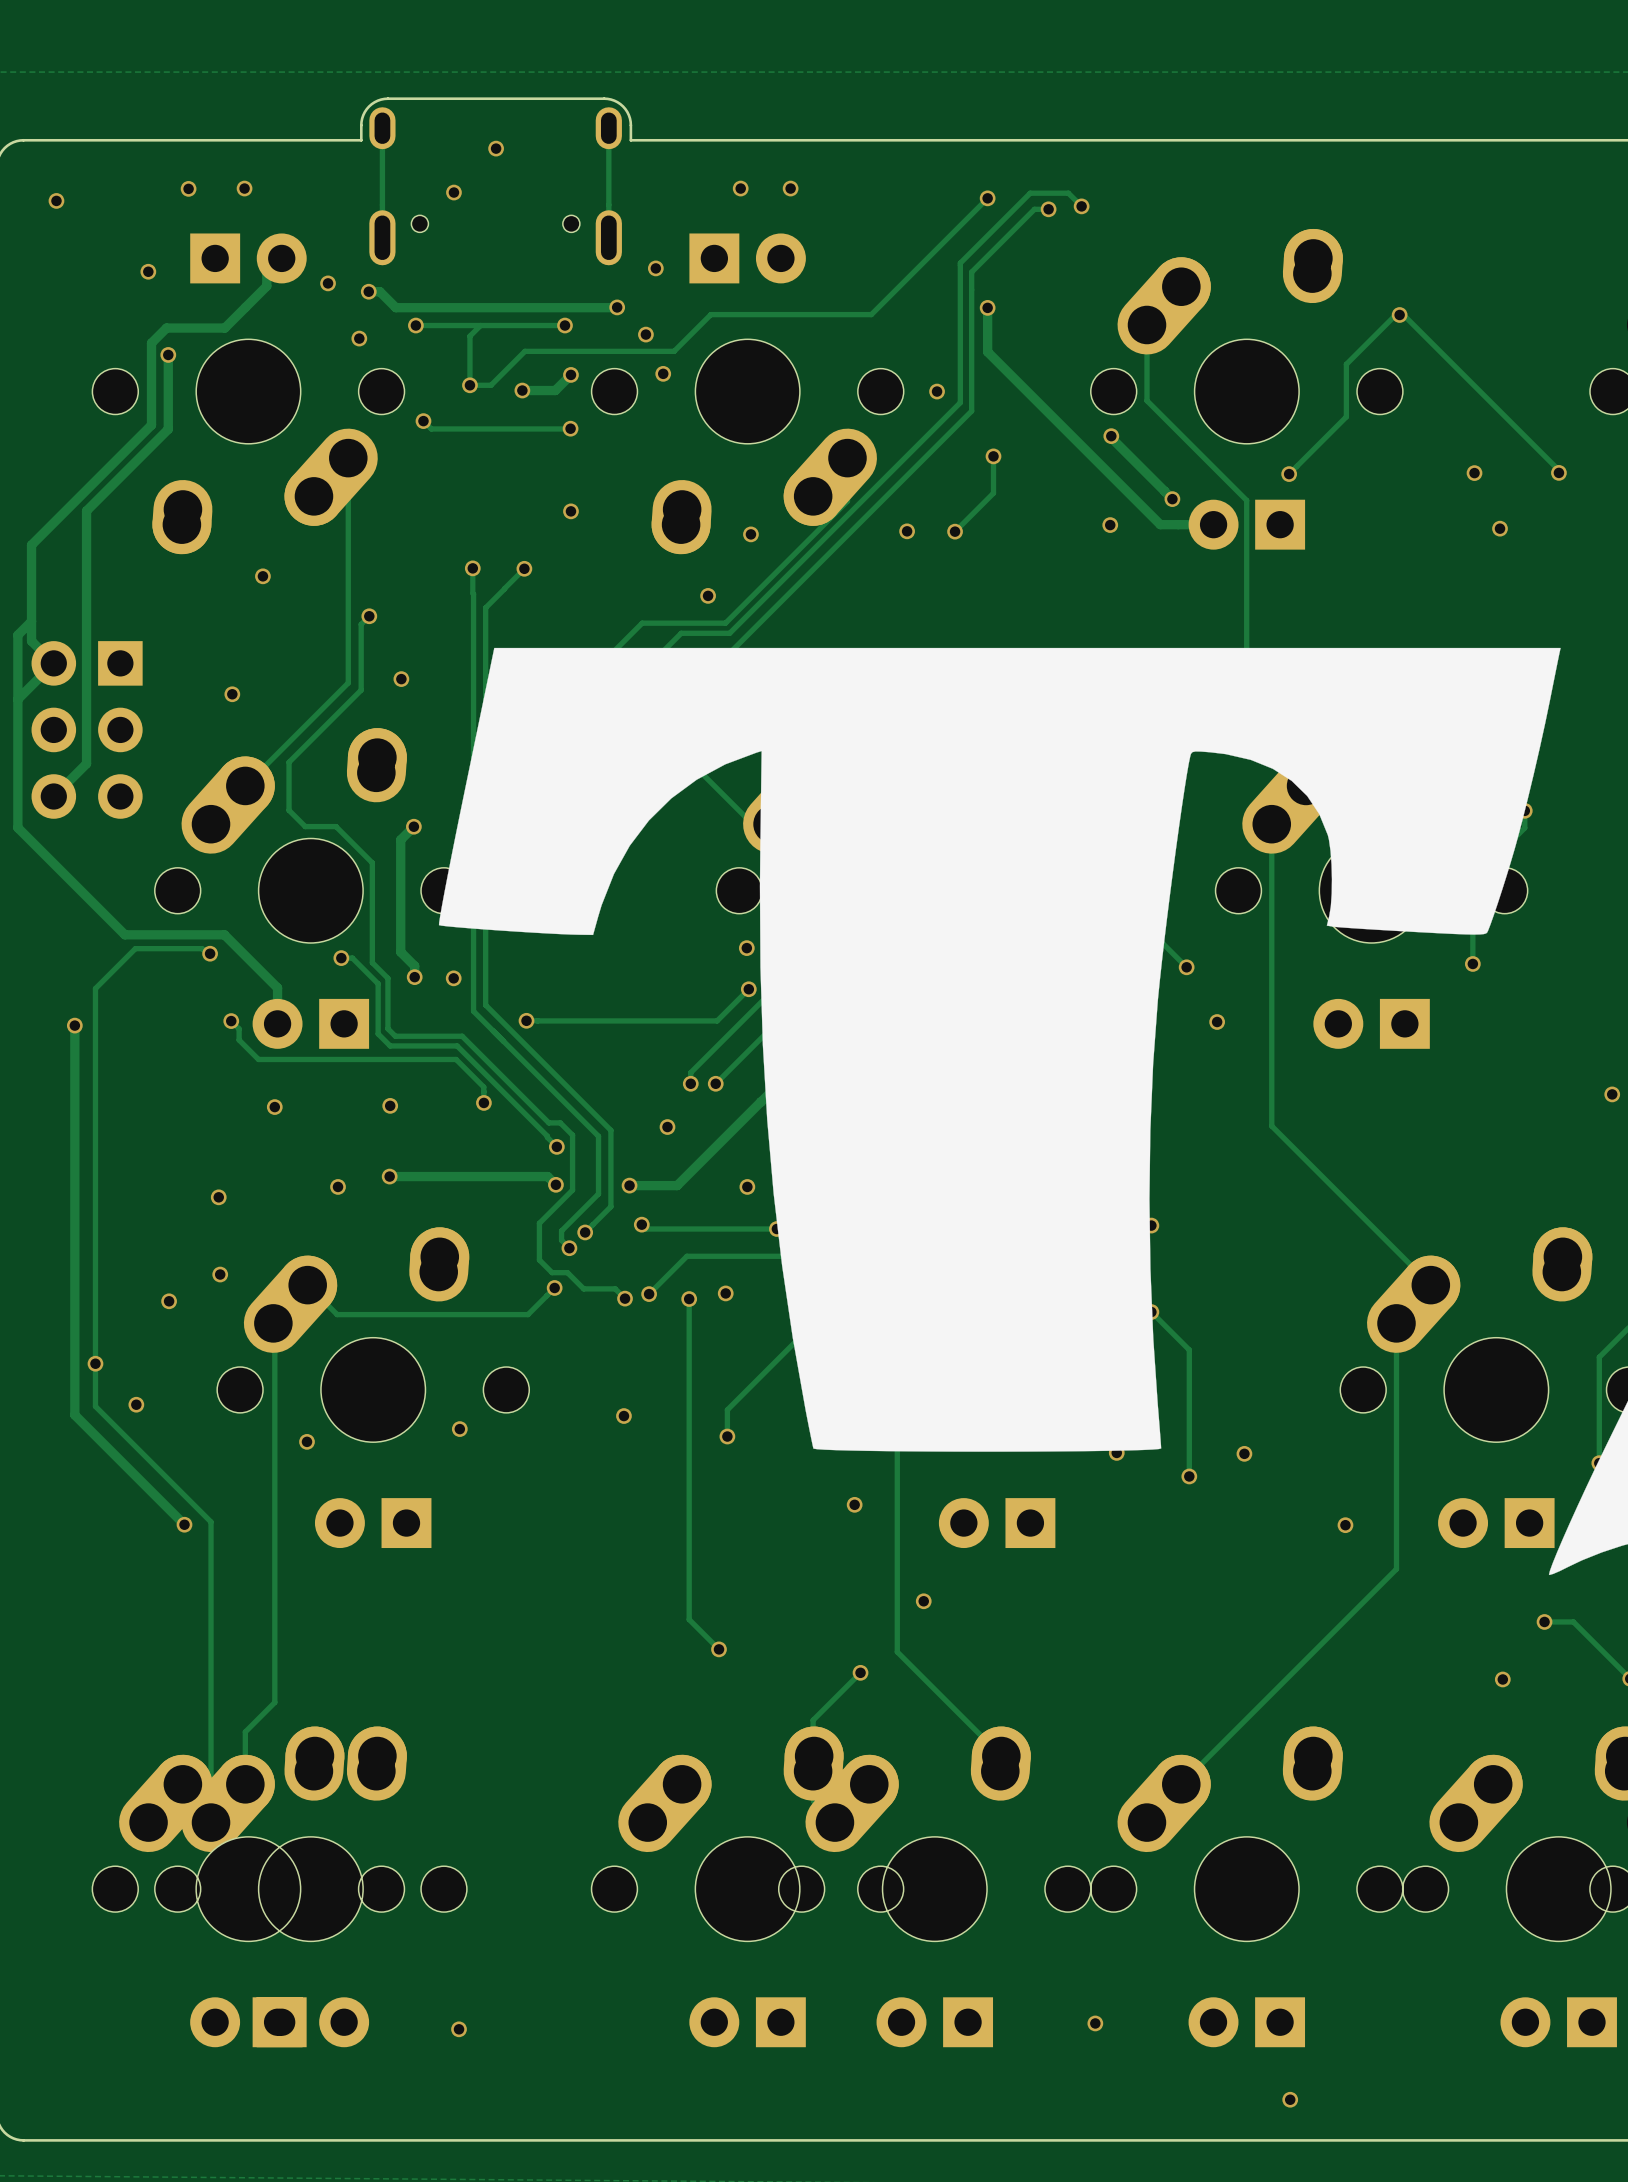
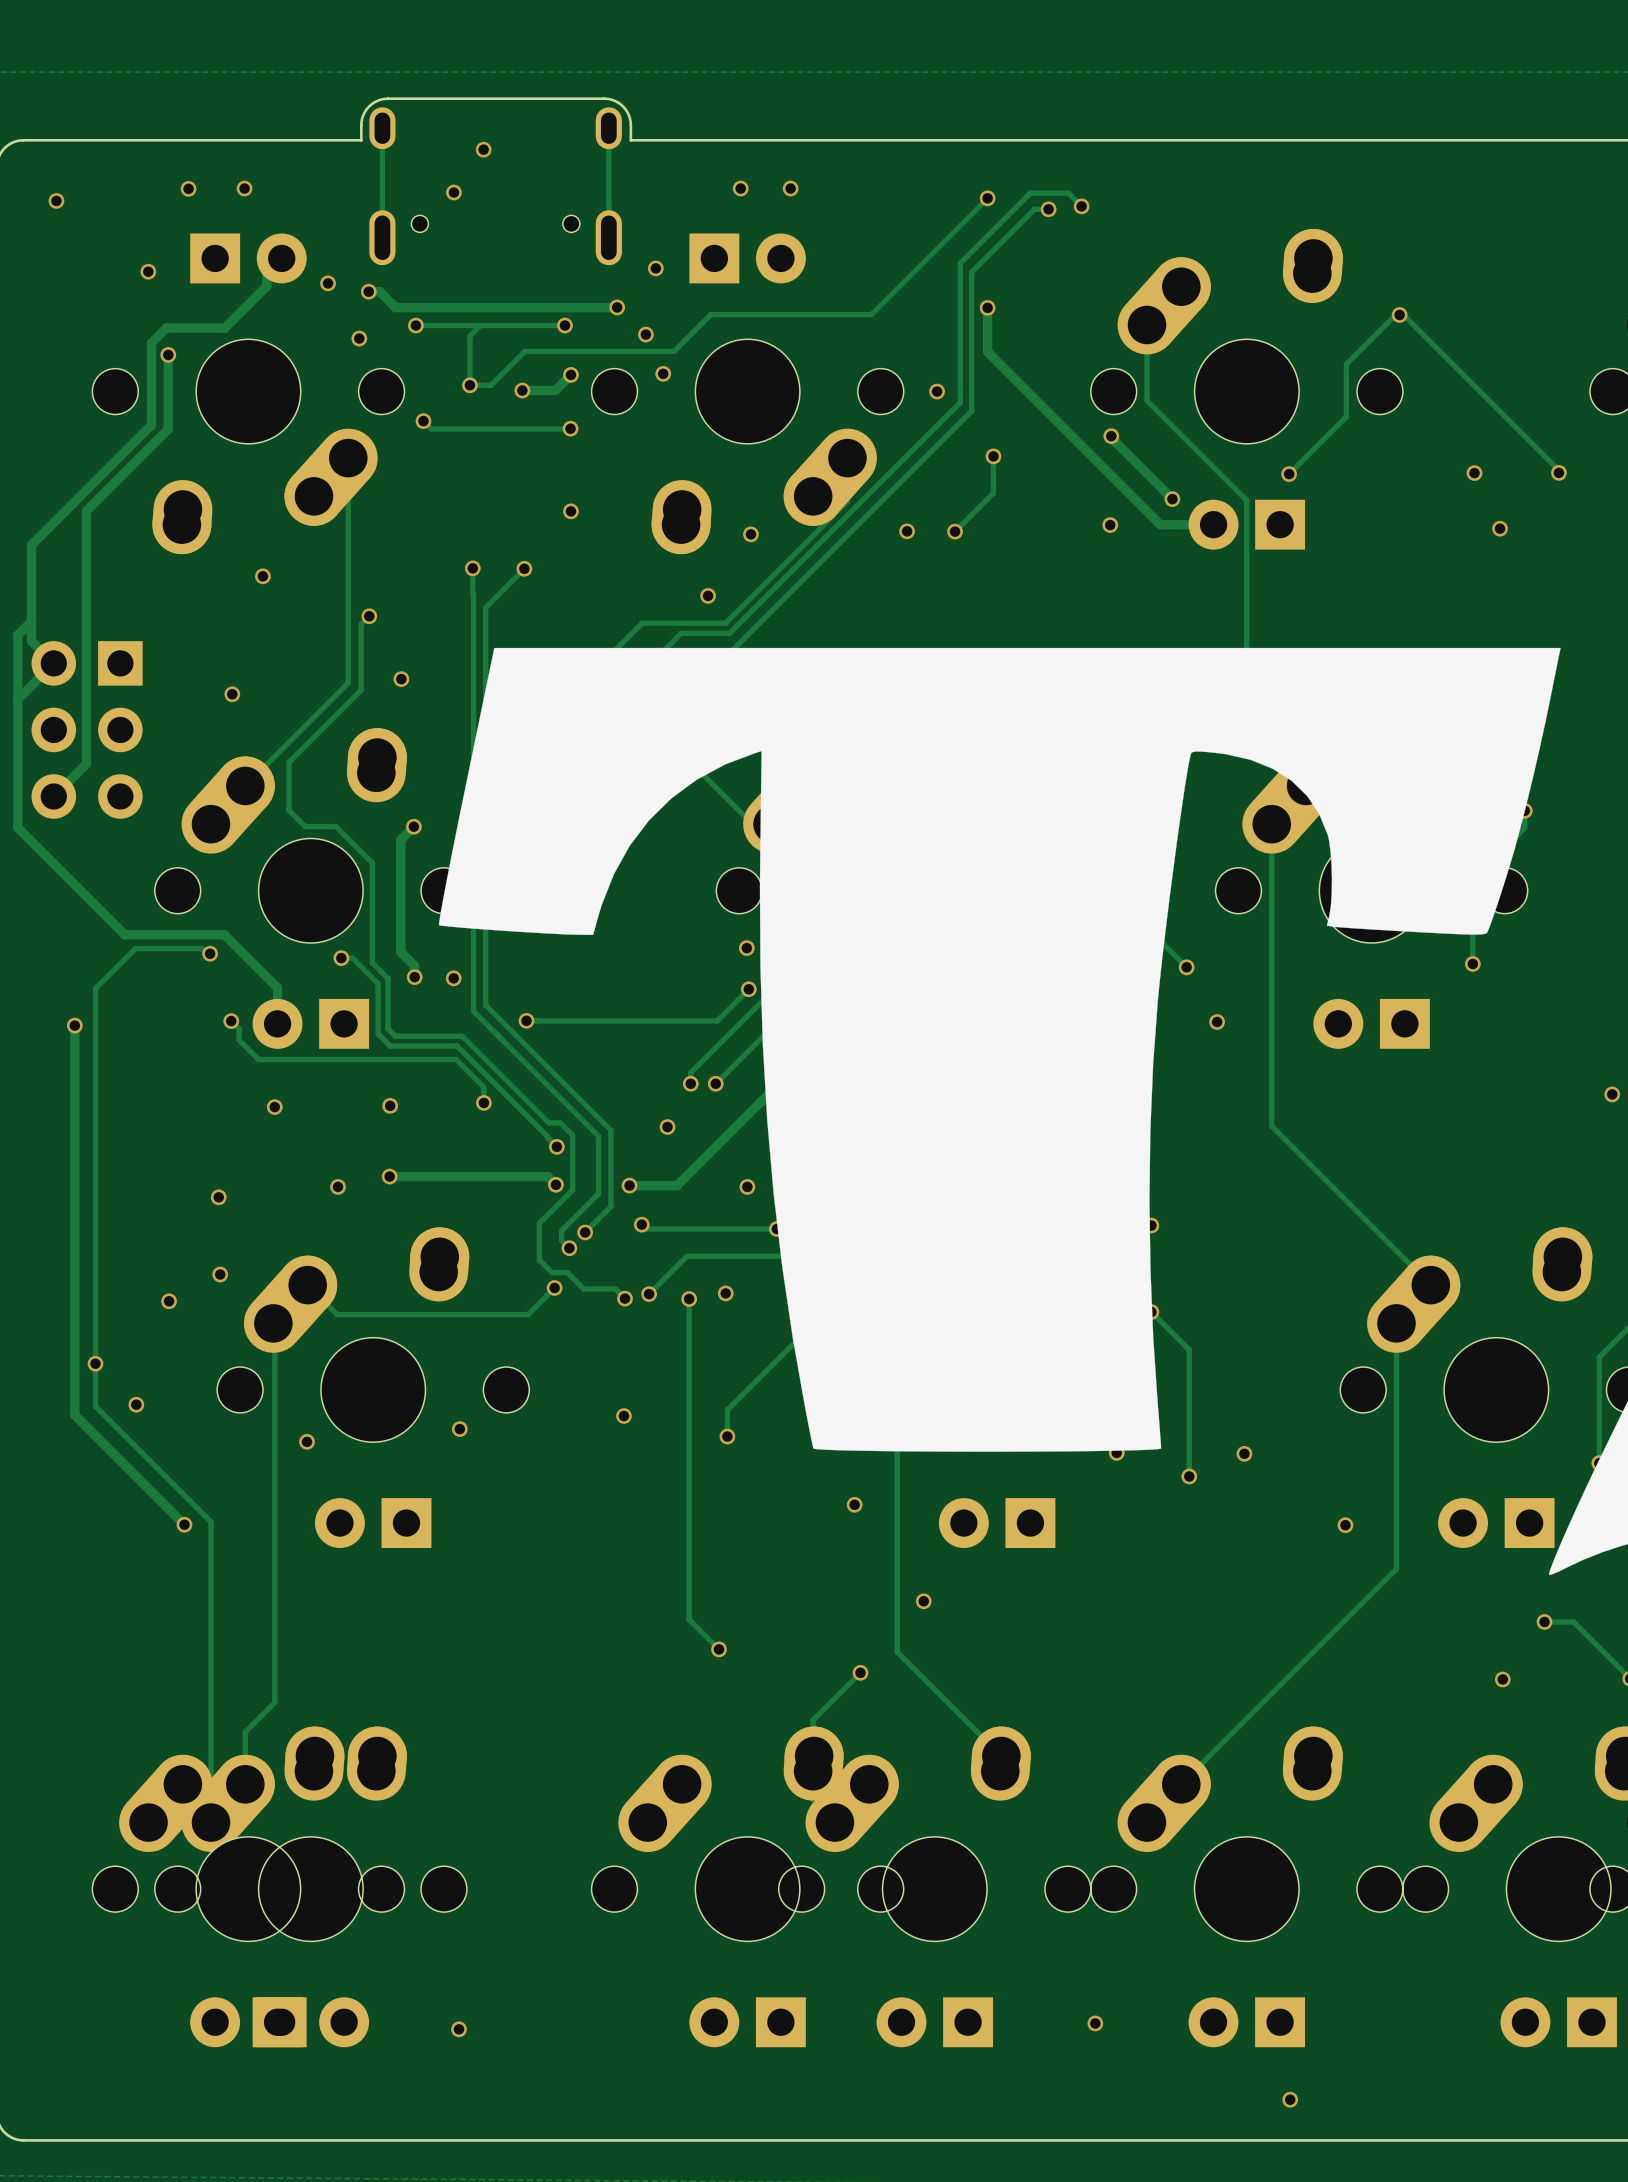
via position: (496, 148) -> (483, 149)

